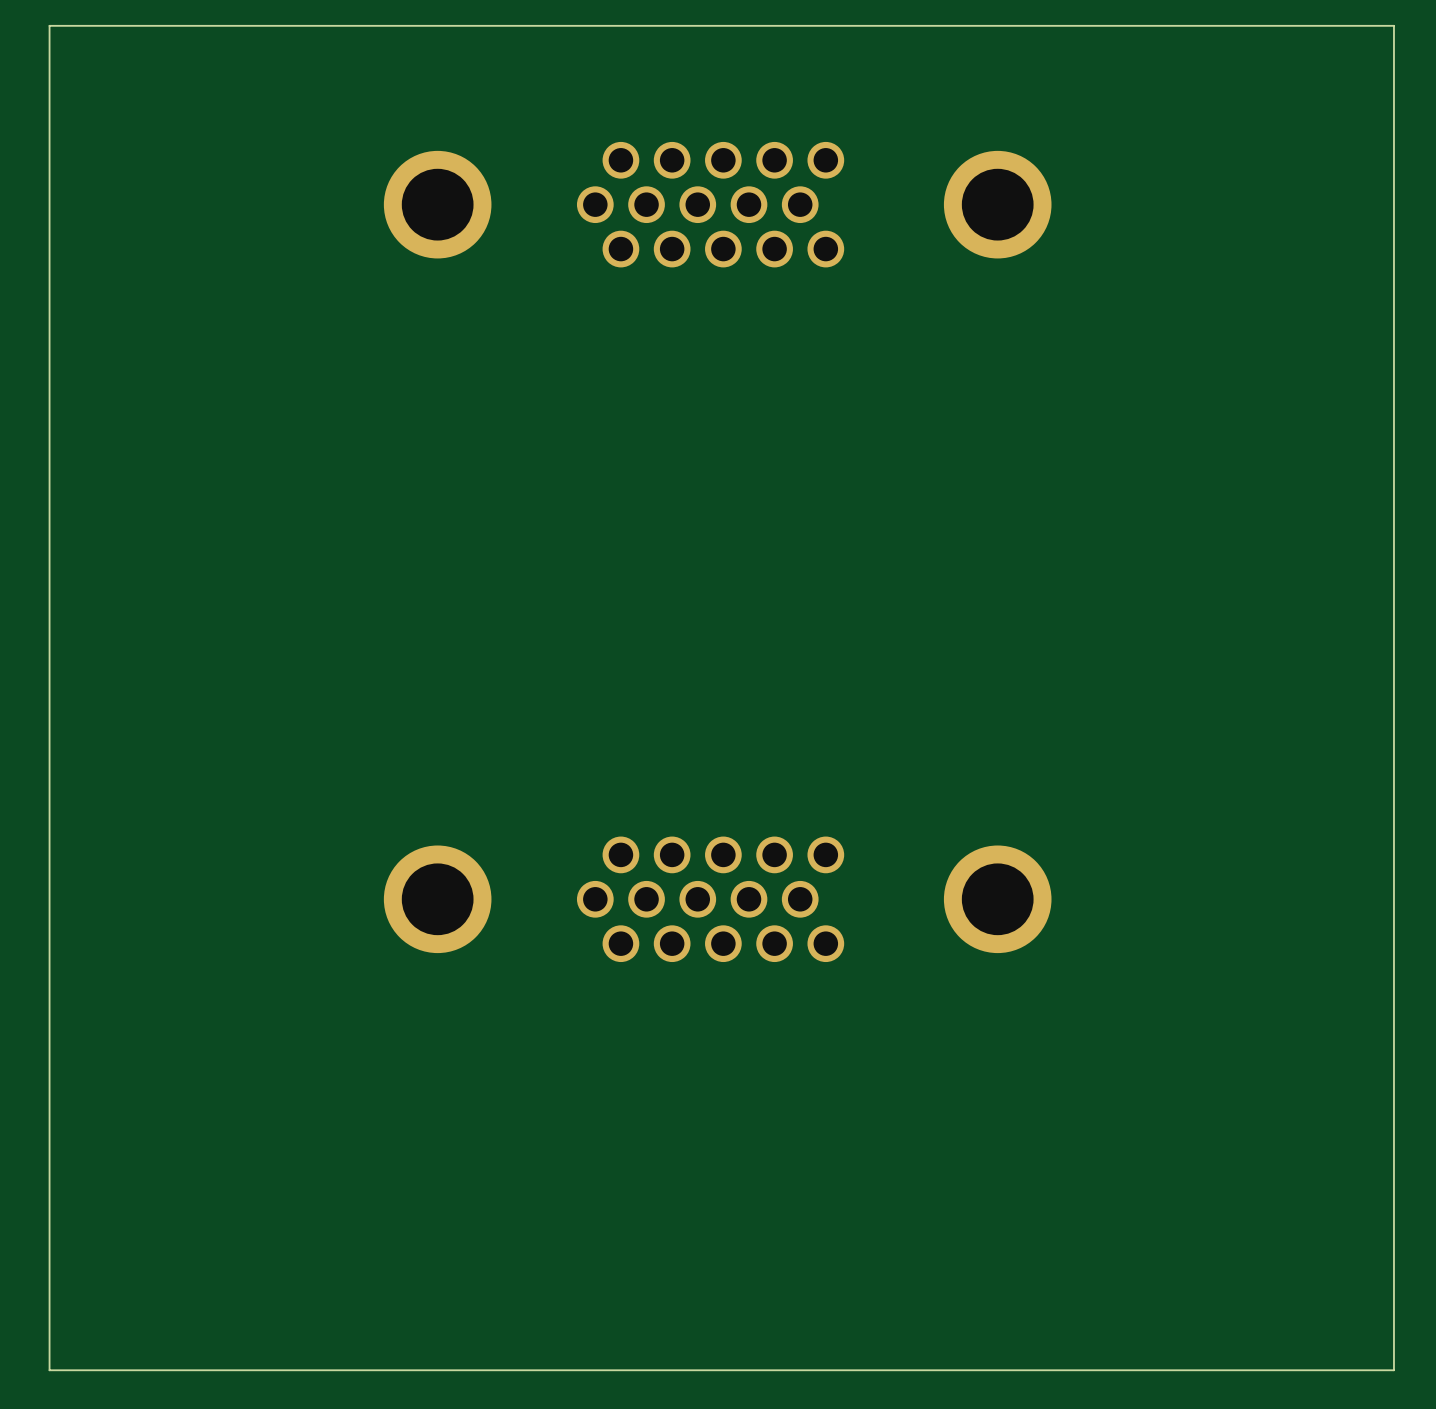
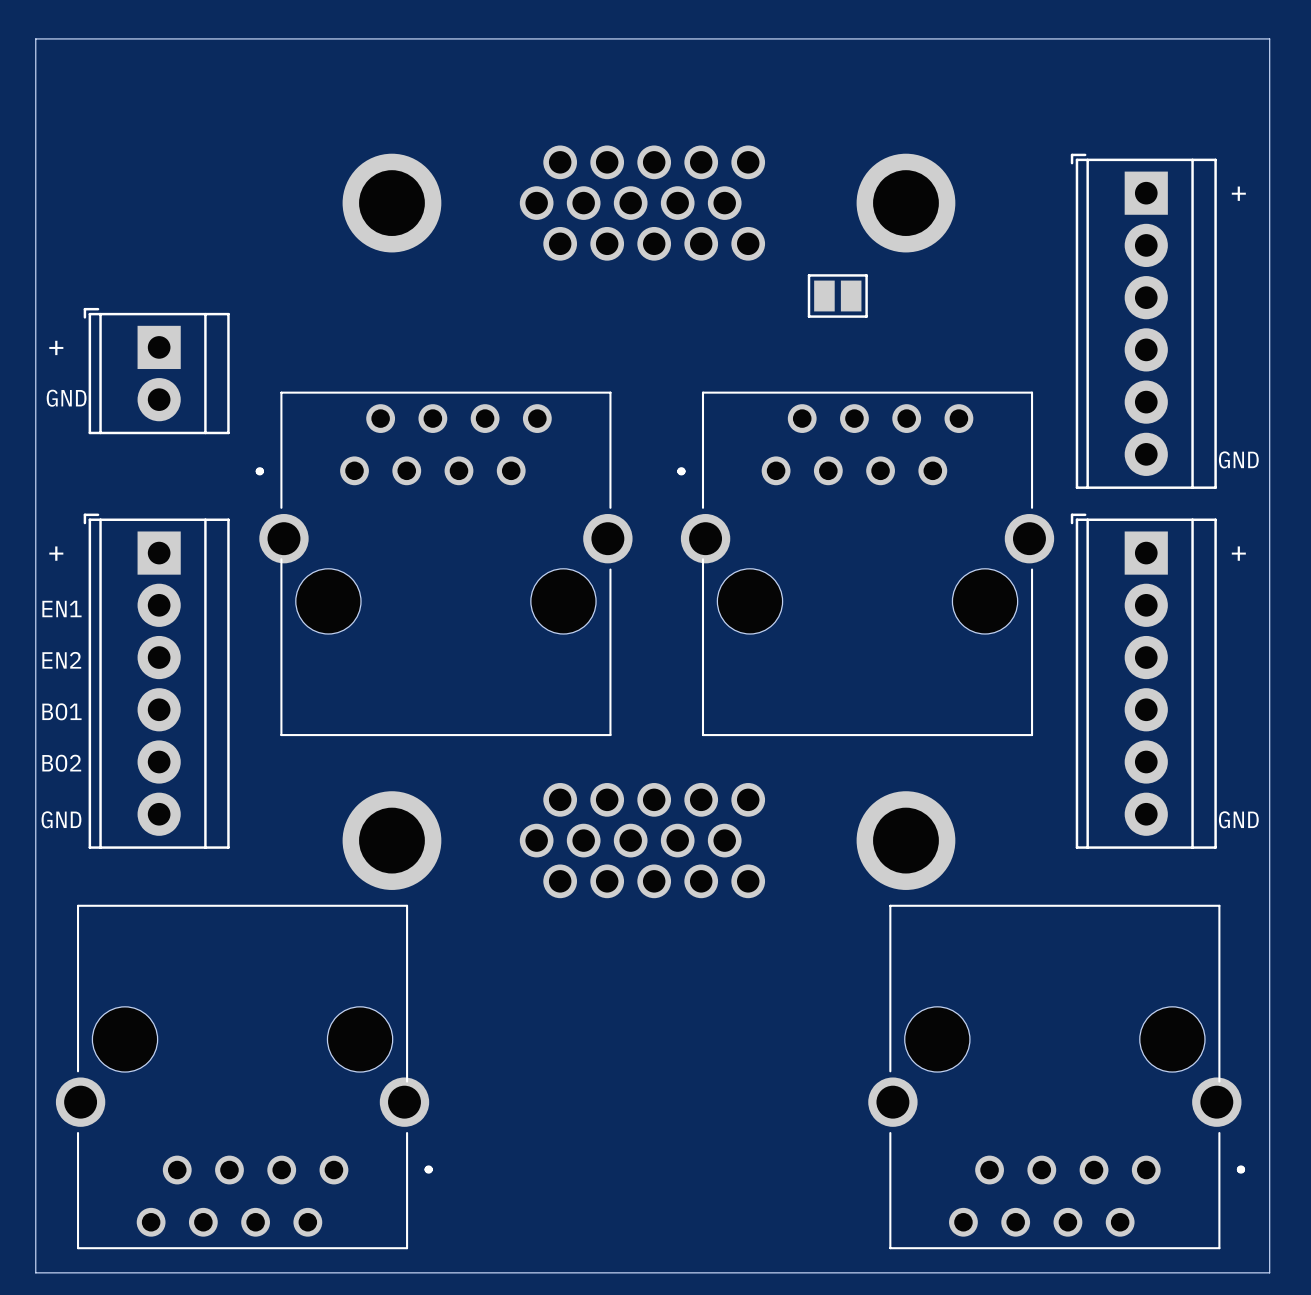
text: none -> + (1238, 193)
part: none -> (837, 296)
part: none -> (1143, 321)
text: none -> + (56, 347)
part: none -> (156, 371)
text: none -> GND (66, 398)
text: none -> GND (1238, 459)
text: none -> + (56, 553)
text: none -> + (1238, 553)
part: none -> (444, 563)
part: none -> (865, 563)
text: none -> EN1 (61, 609)
text: none -> EN2 (61, 660)
part: none -> (156, 681)
part: none -> (1143, 681)
text: none -> BO1 (61, 711)
text: none -> BO2 (61, 763)
text: none -> GND (61, 819)
text: none -> GND (1238, 819)
part: none -> (244, 1076)
part: none -> (1056, 1076)

